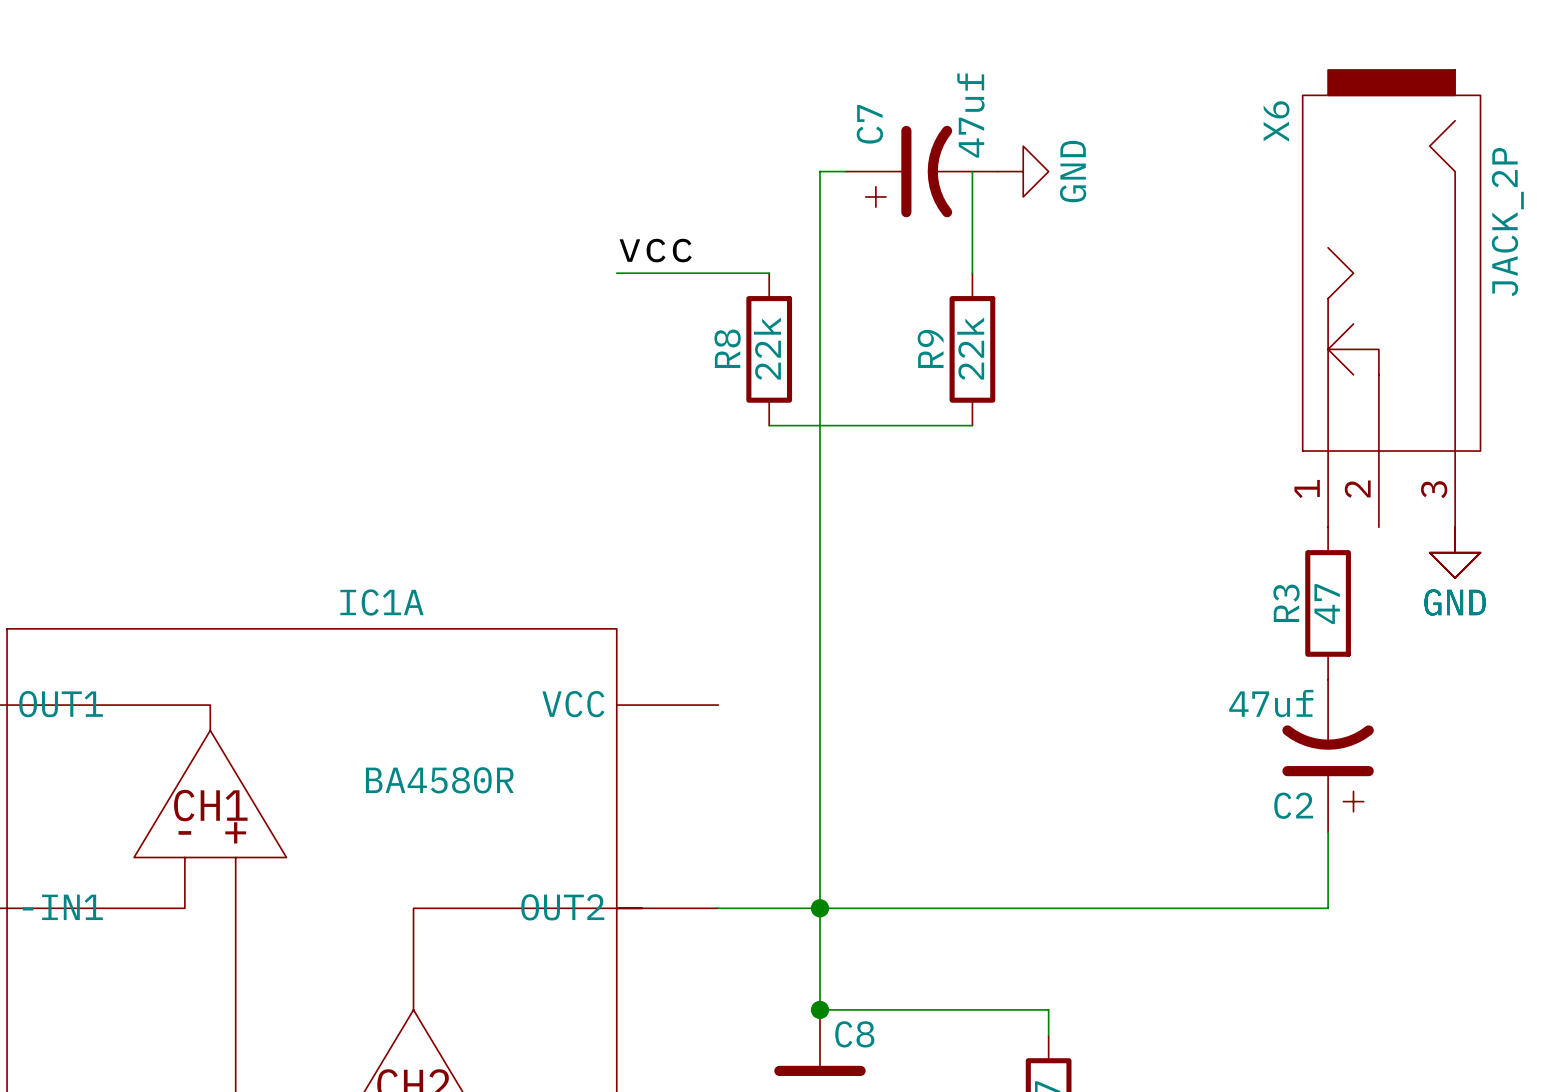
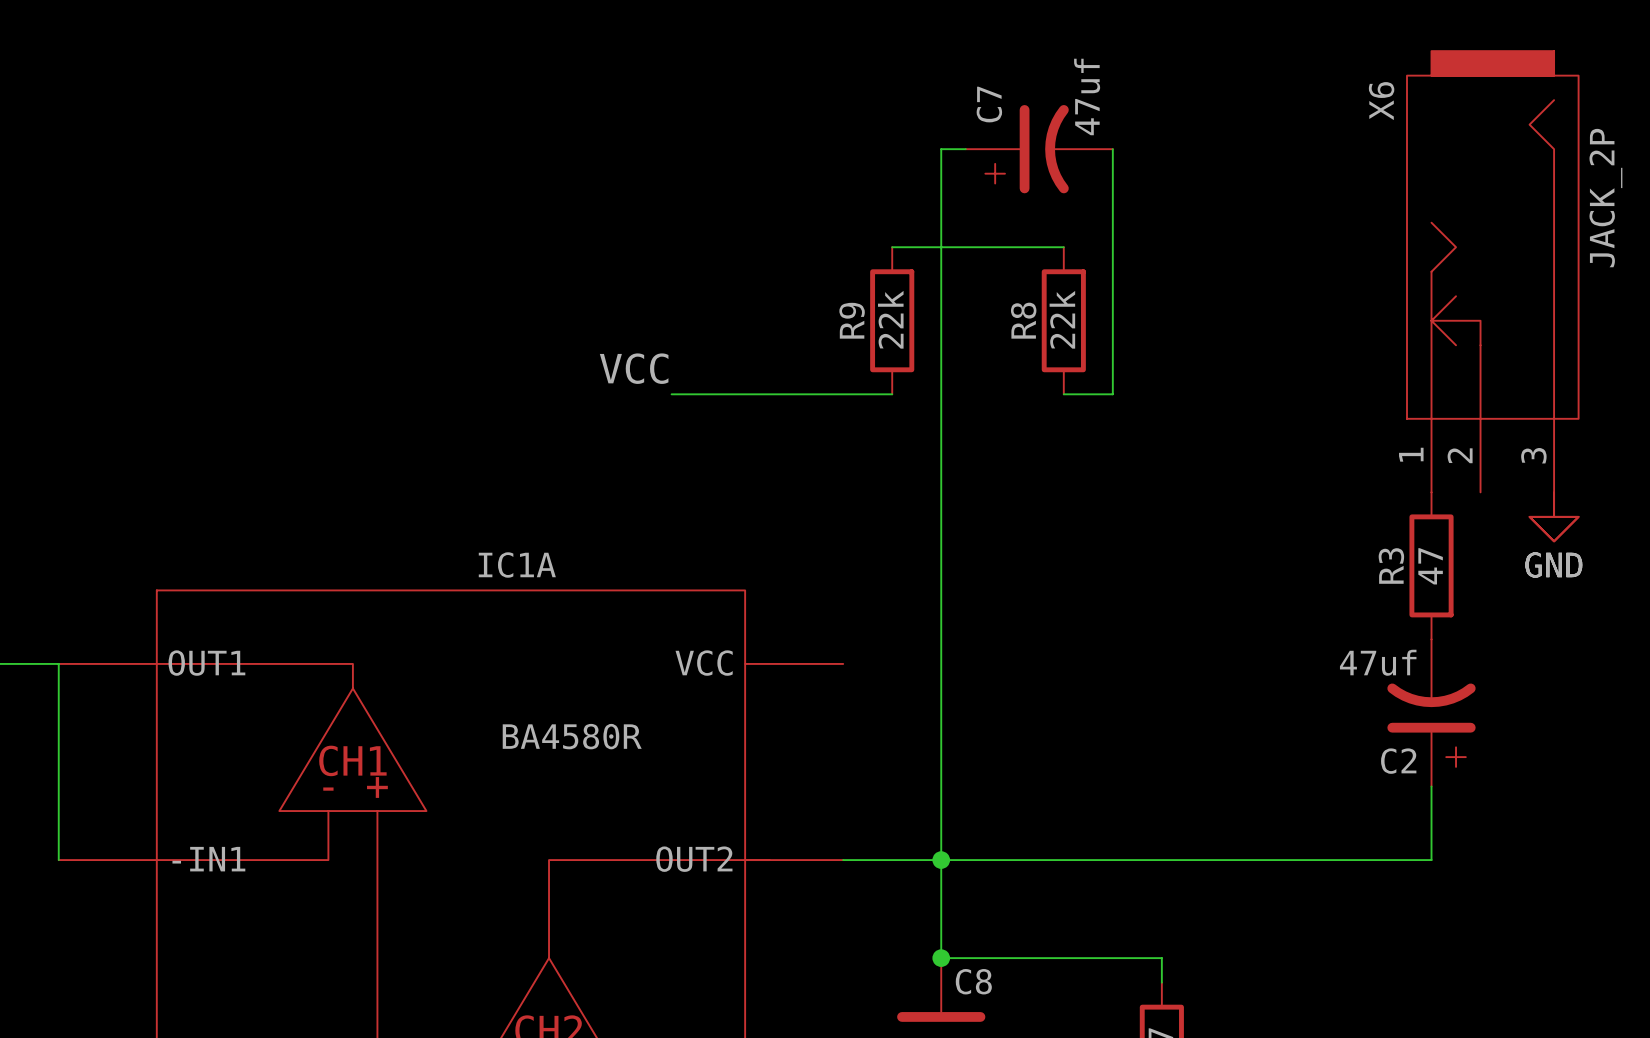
wire: (972, 171) (972, 273) -> none
wire: none -> (1112, 149) (1112, 394) (1088, 394)
power symbol: GND (1023, 171) -> none
label: vcc (655, 250) -> none
wire: (616, 273) (769, 273) -> (1063, 247) (892, 247)
R8 name: R8 (727, 348) -> R9 (852, 320)
R8: none -> 22k (1063, 320)
R9: 22k (972, 349) -> none
label: none -> VCC (634, 368)
wire: (769, 425) (947, 425) -> (892, 394) (671, 394)

